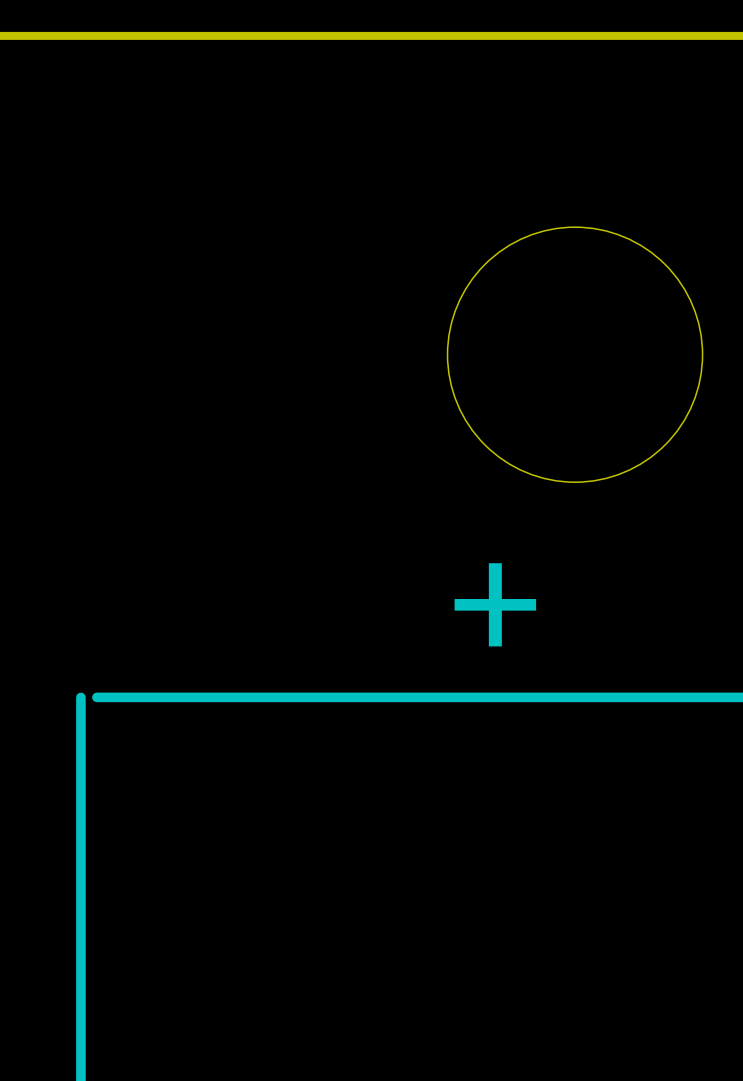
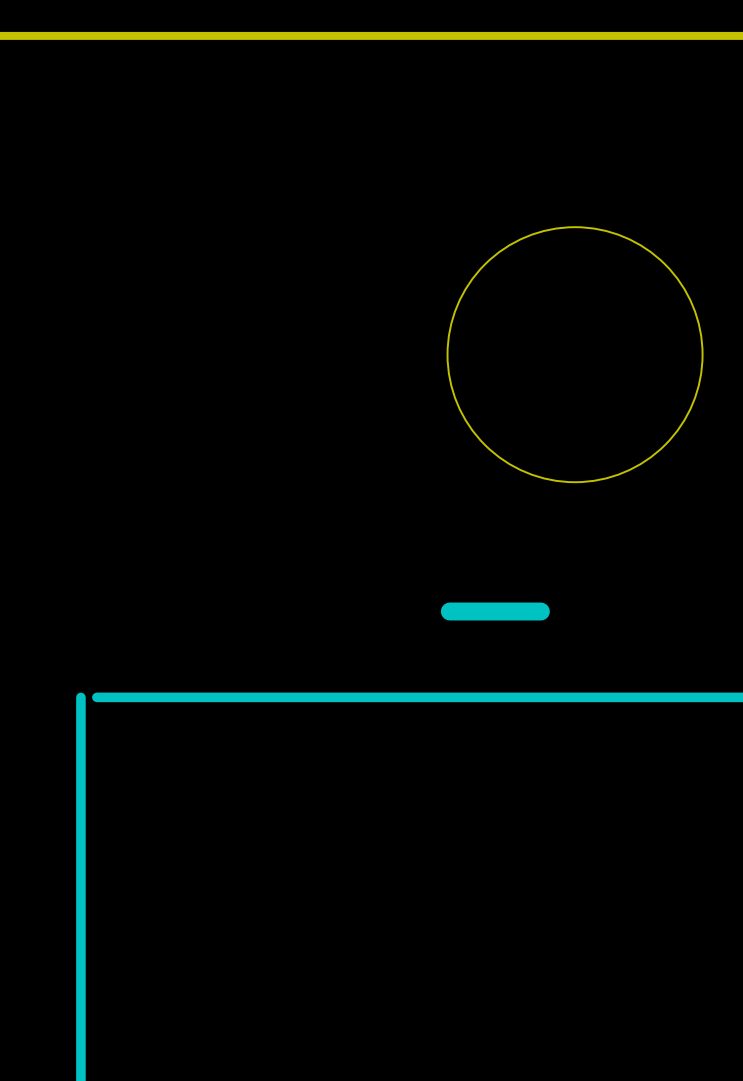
text: + (495, 604) -> - (495, 611)

